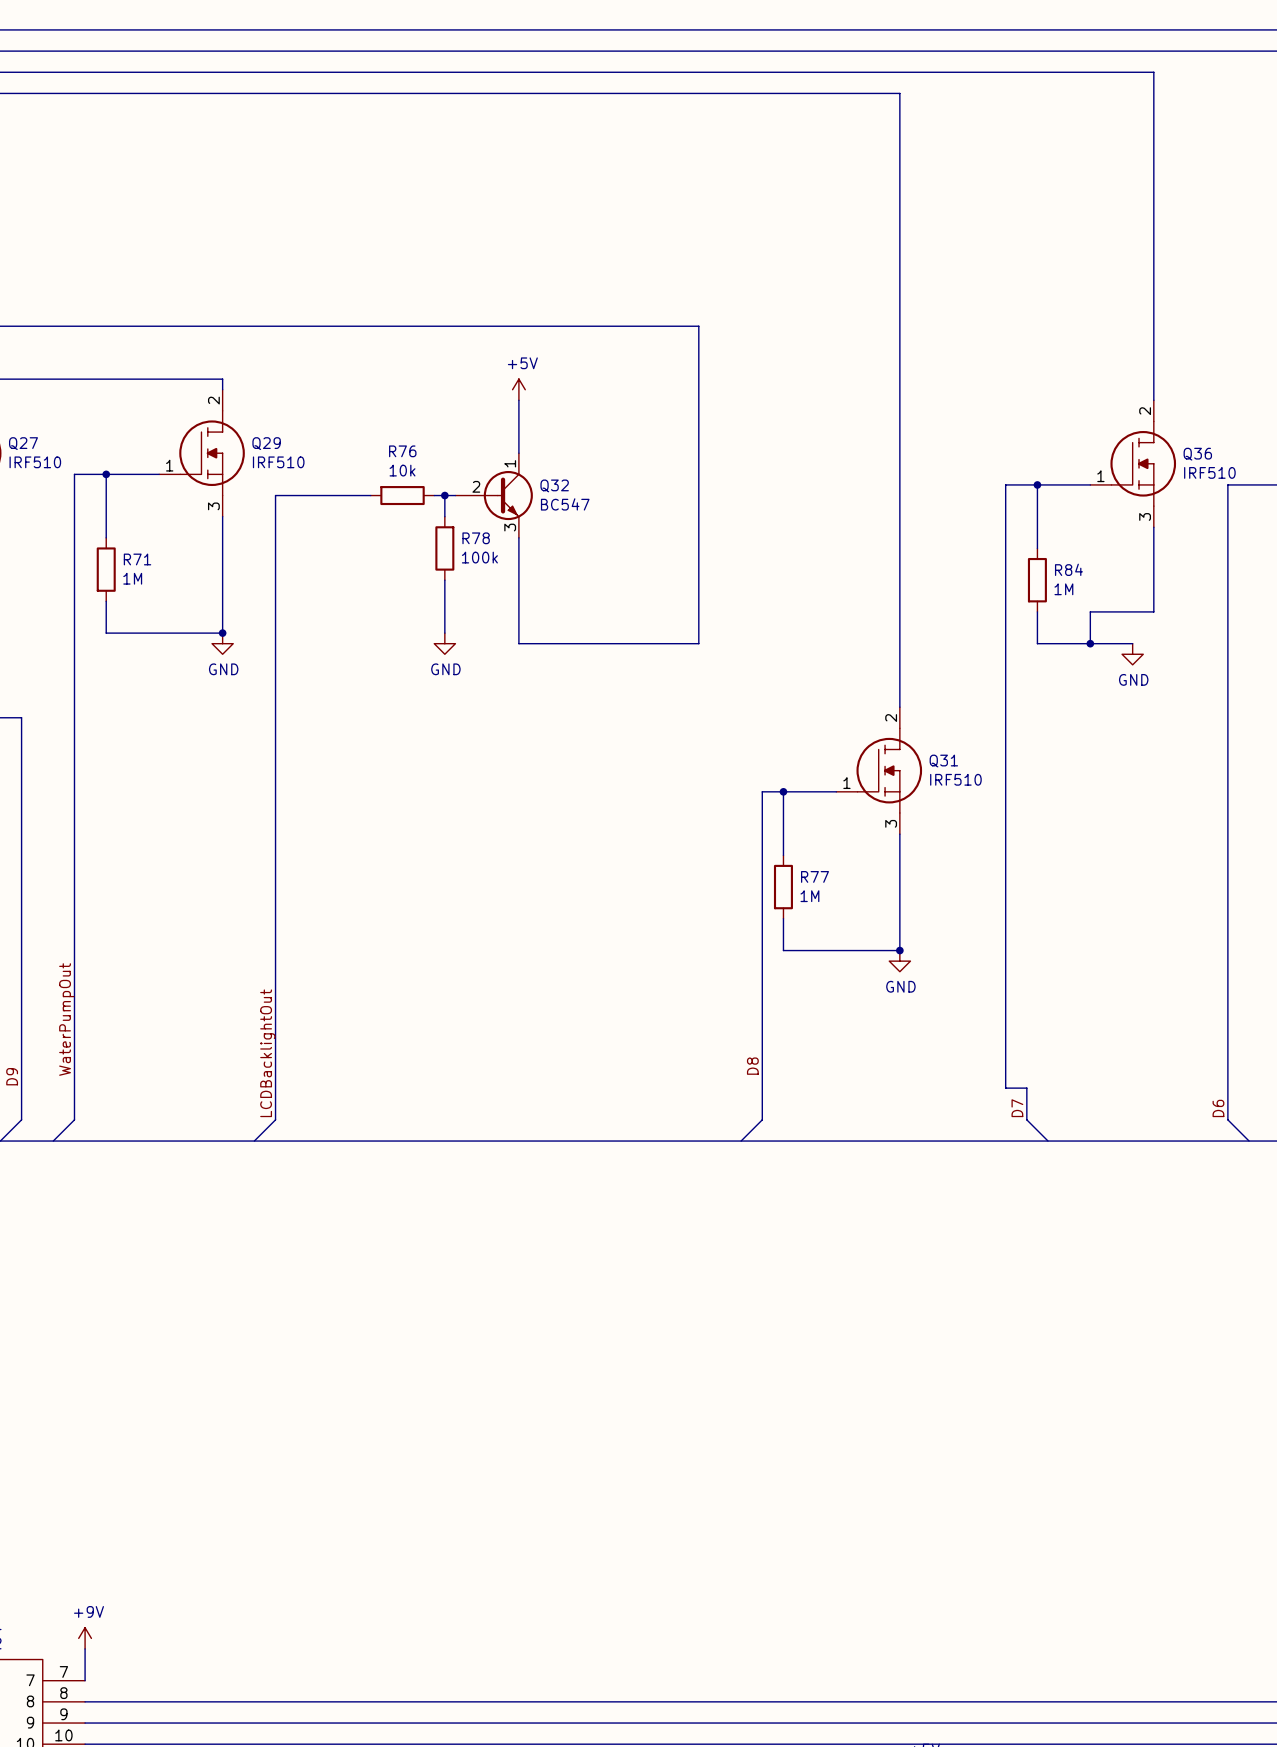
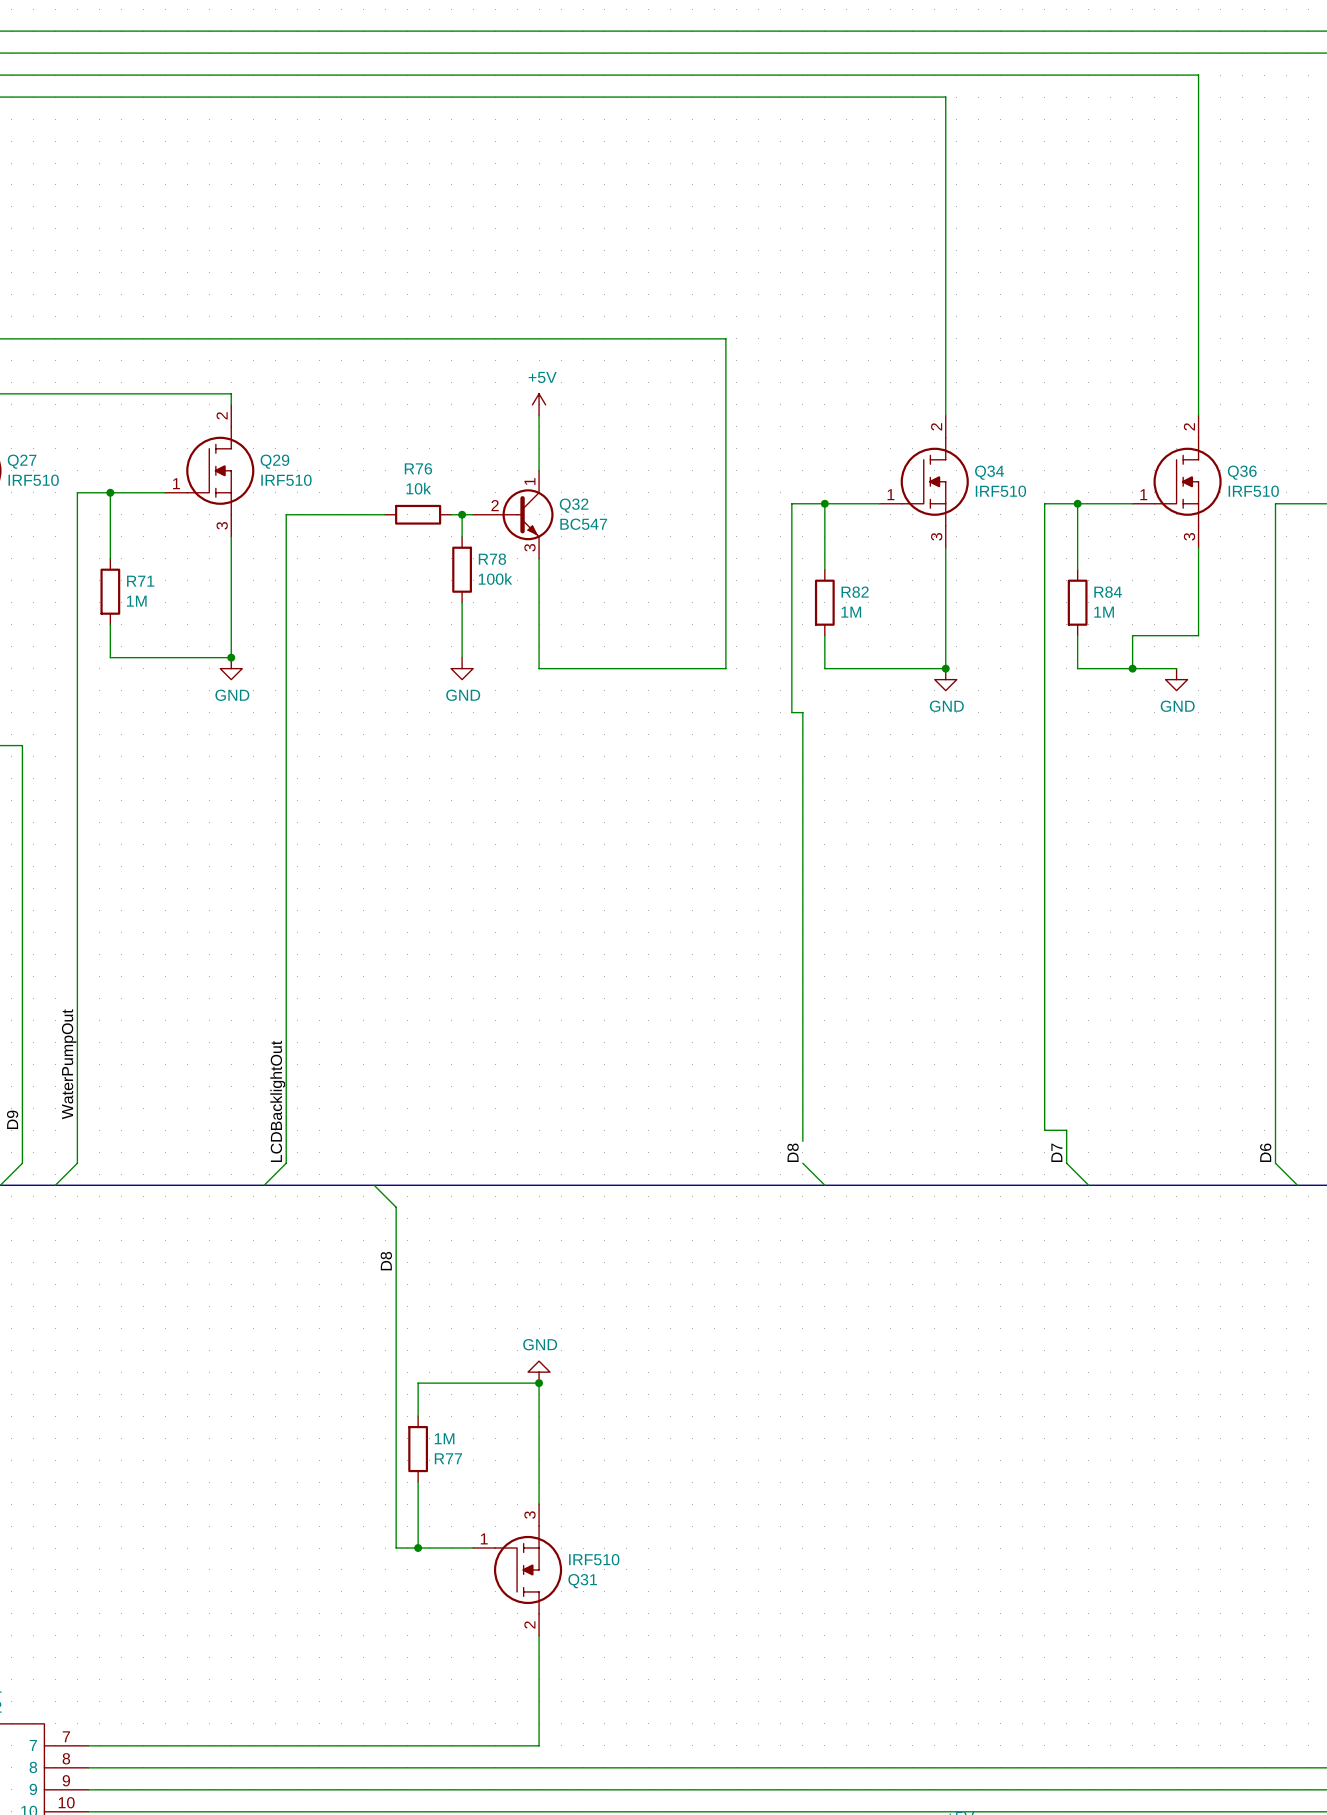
wire: (899, 93) (899, 707) -> (934, 97) (945, 97) (945, 415)
Q34: none -> IRF510 (924, 481)
wire: none -> (824, 503) (824, 569)
junction: none -> (824, 503)
wire: none -> (879, 503) (791, 503) (791, 712) (802, 712) (802, 1141)
wire: none -> (945, 547) (945, 668) (824, 668) (824, 635)
R82: none -> 1M (824, 602)
junction: none -> (945, 668)
power symbol: none -> GND (945, 679)
Q31 position: (879, 770) -> (517, 1569)
Q31 flip: as is (889, 770) -> up-down (528, 1569)
wire: (783, 791) (783, 855) -> none
junction: (783, 791) -> none
wire: (836, 791) (762, 791) (762, 1119) (741, 1141) -> none
wire: (899, 834) (899, 950) (783, 950) (783, 918) -> none
R77 name position: R77 (814, 876) -> R77 (448, 1458)
R77 position: (783, 887) -> (418, 1449)
R77 value position: 1M (809, 896) -> 1M (444, 1438)
junction: (899, 950) -> none
power symbol: GND (899, 961) -> none
label position: D8 (752, 1066) -> D8 (793, 1152)
wire: none -> (802, 1163) (824, 1185)
wire: none -> (374, 1185) (396, 1207) (396, 1548) (473, 1548)
label: none -> D8 (386, 1261)
power symbol: none -> GND (539, 1372)
junction: none -> (539, 1383)
wire: none -> (418, 1416) (418, 1383) (539, 1383) (539, 1504)
wire: none -> (418, 1482) (418, 1548)
junction: none -> (418, 1548)
power symbol: +9V (85, 1638) -> none
wire: (85, 1648) (85, 1680) -> (539, 1635) (539, 1745) (88, 1745)

